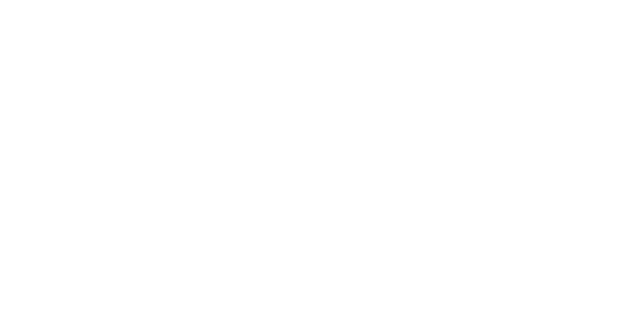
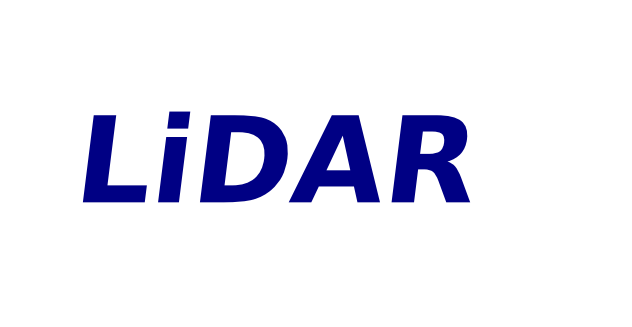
text: none -> LiDAR (276, 156)

